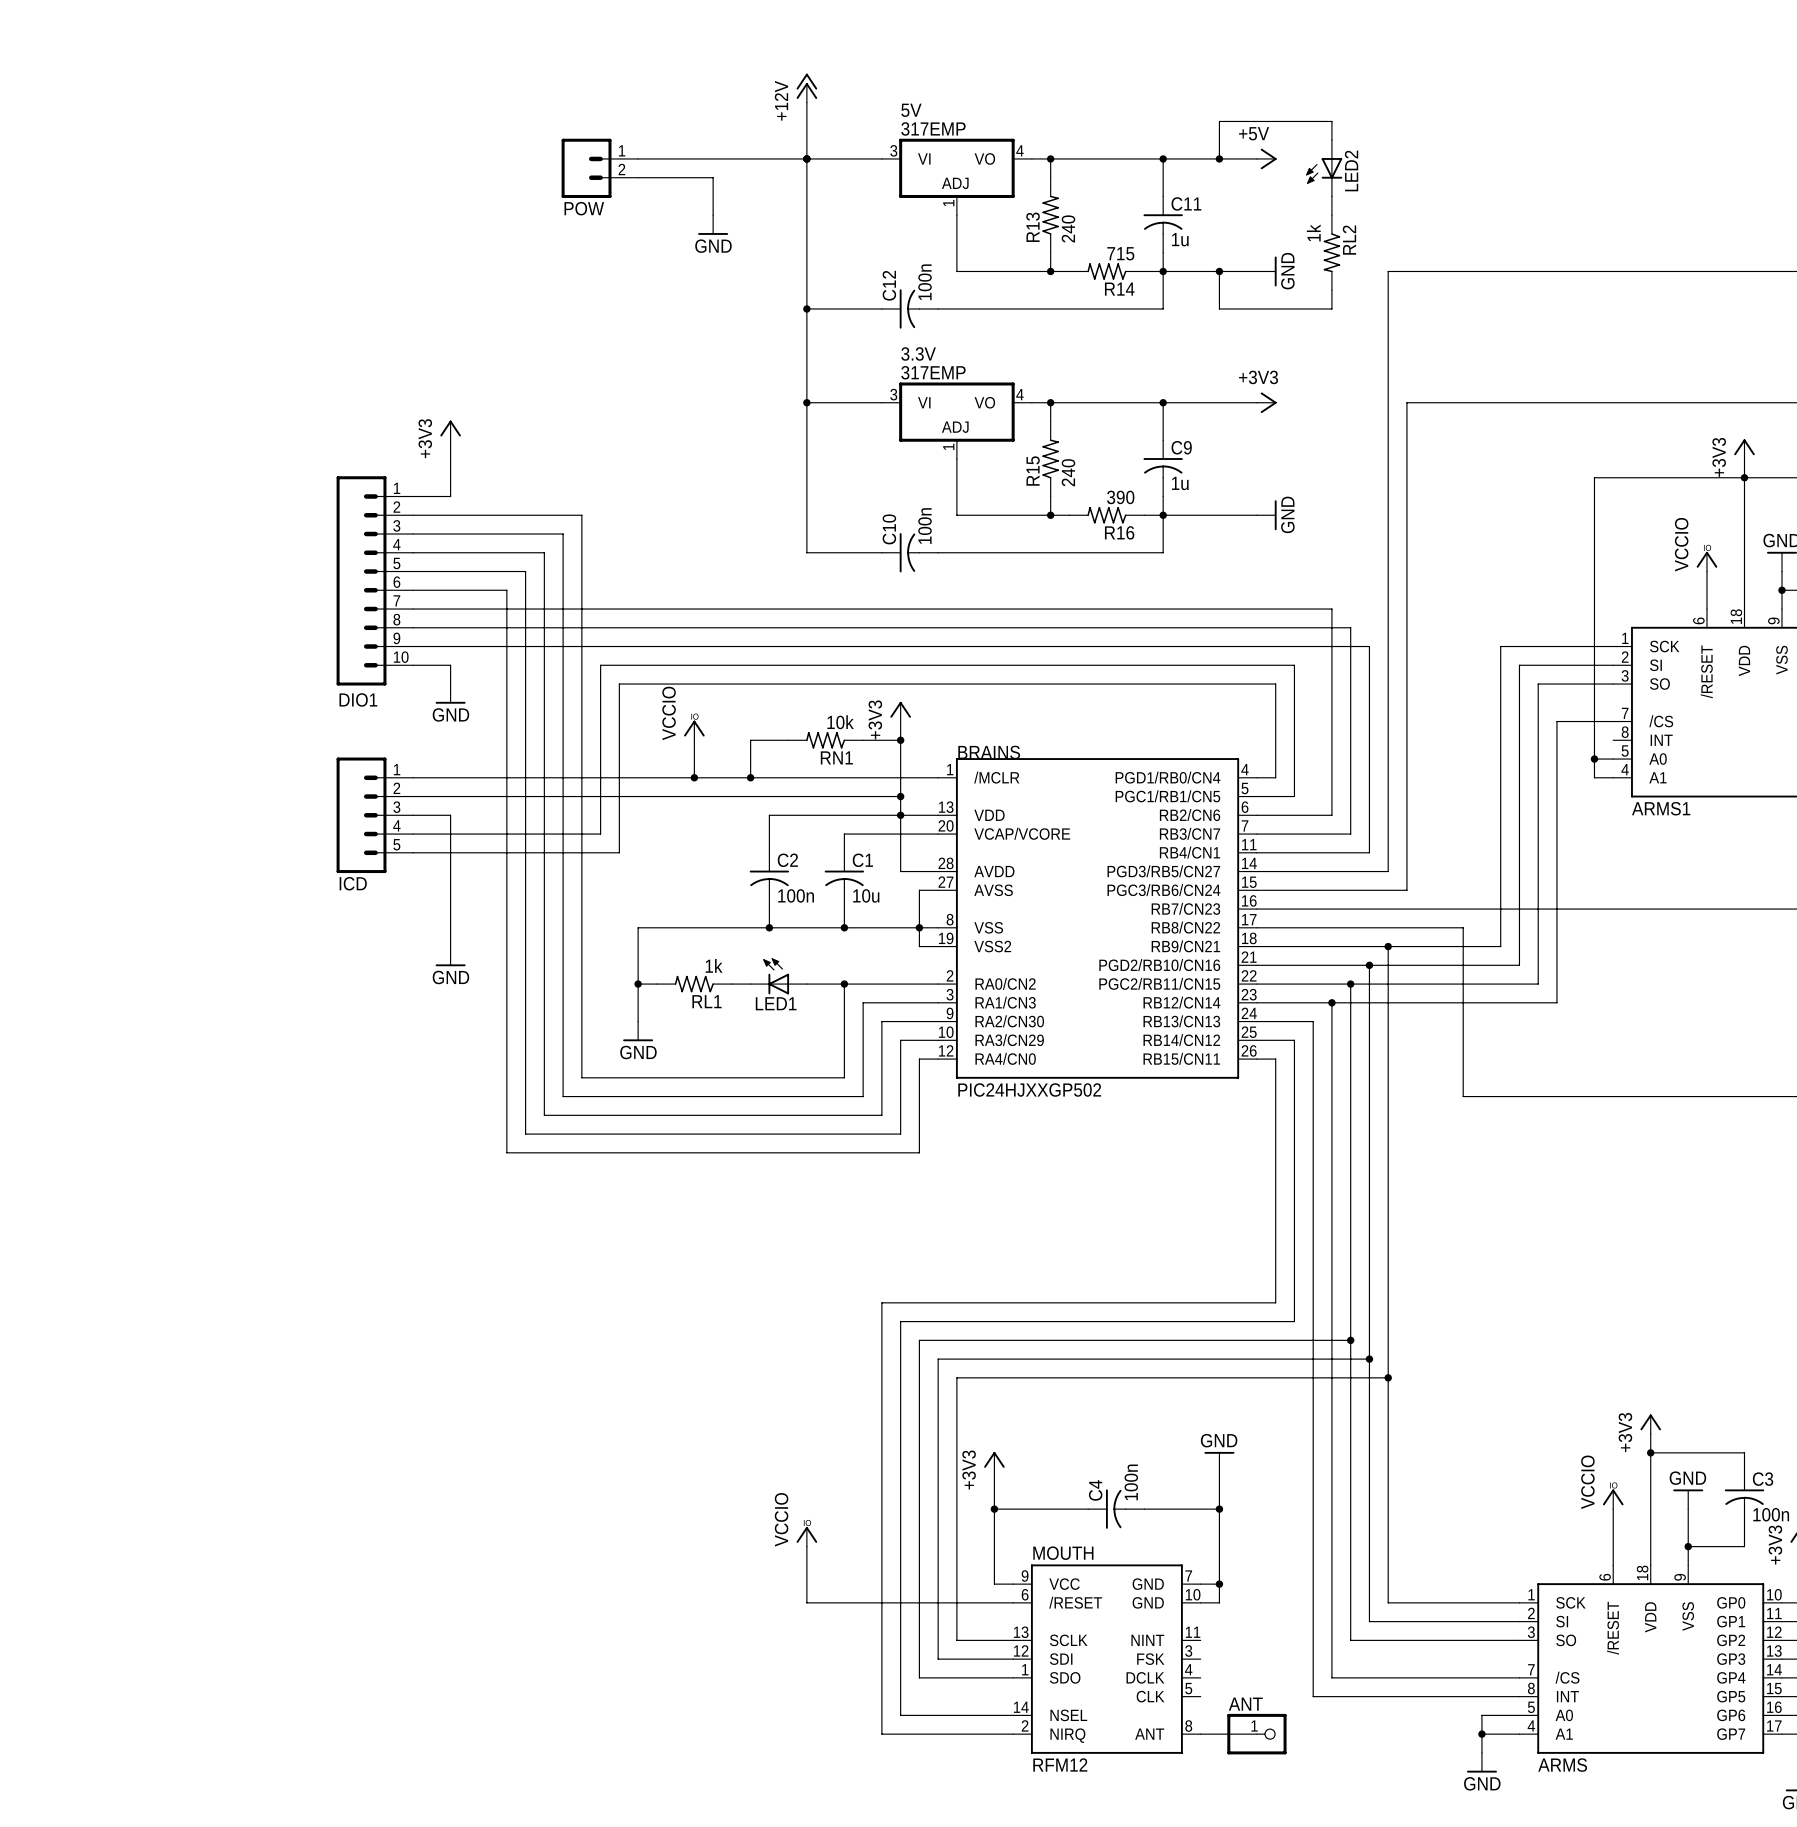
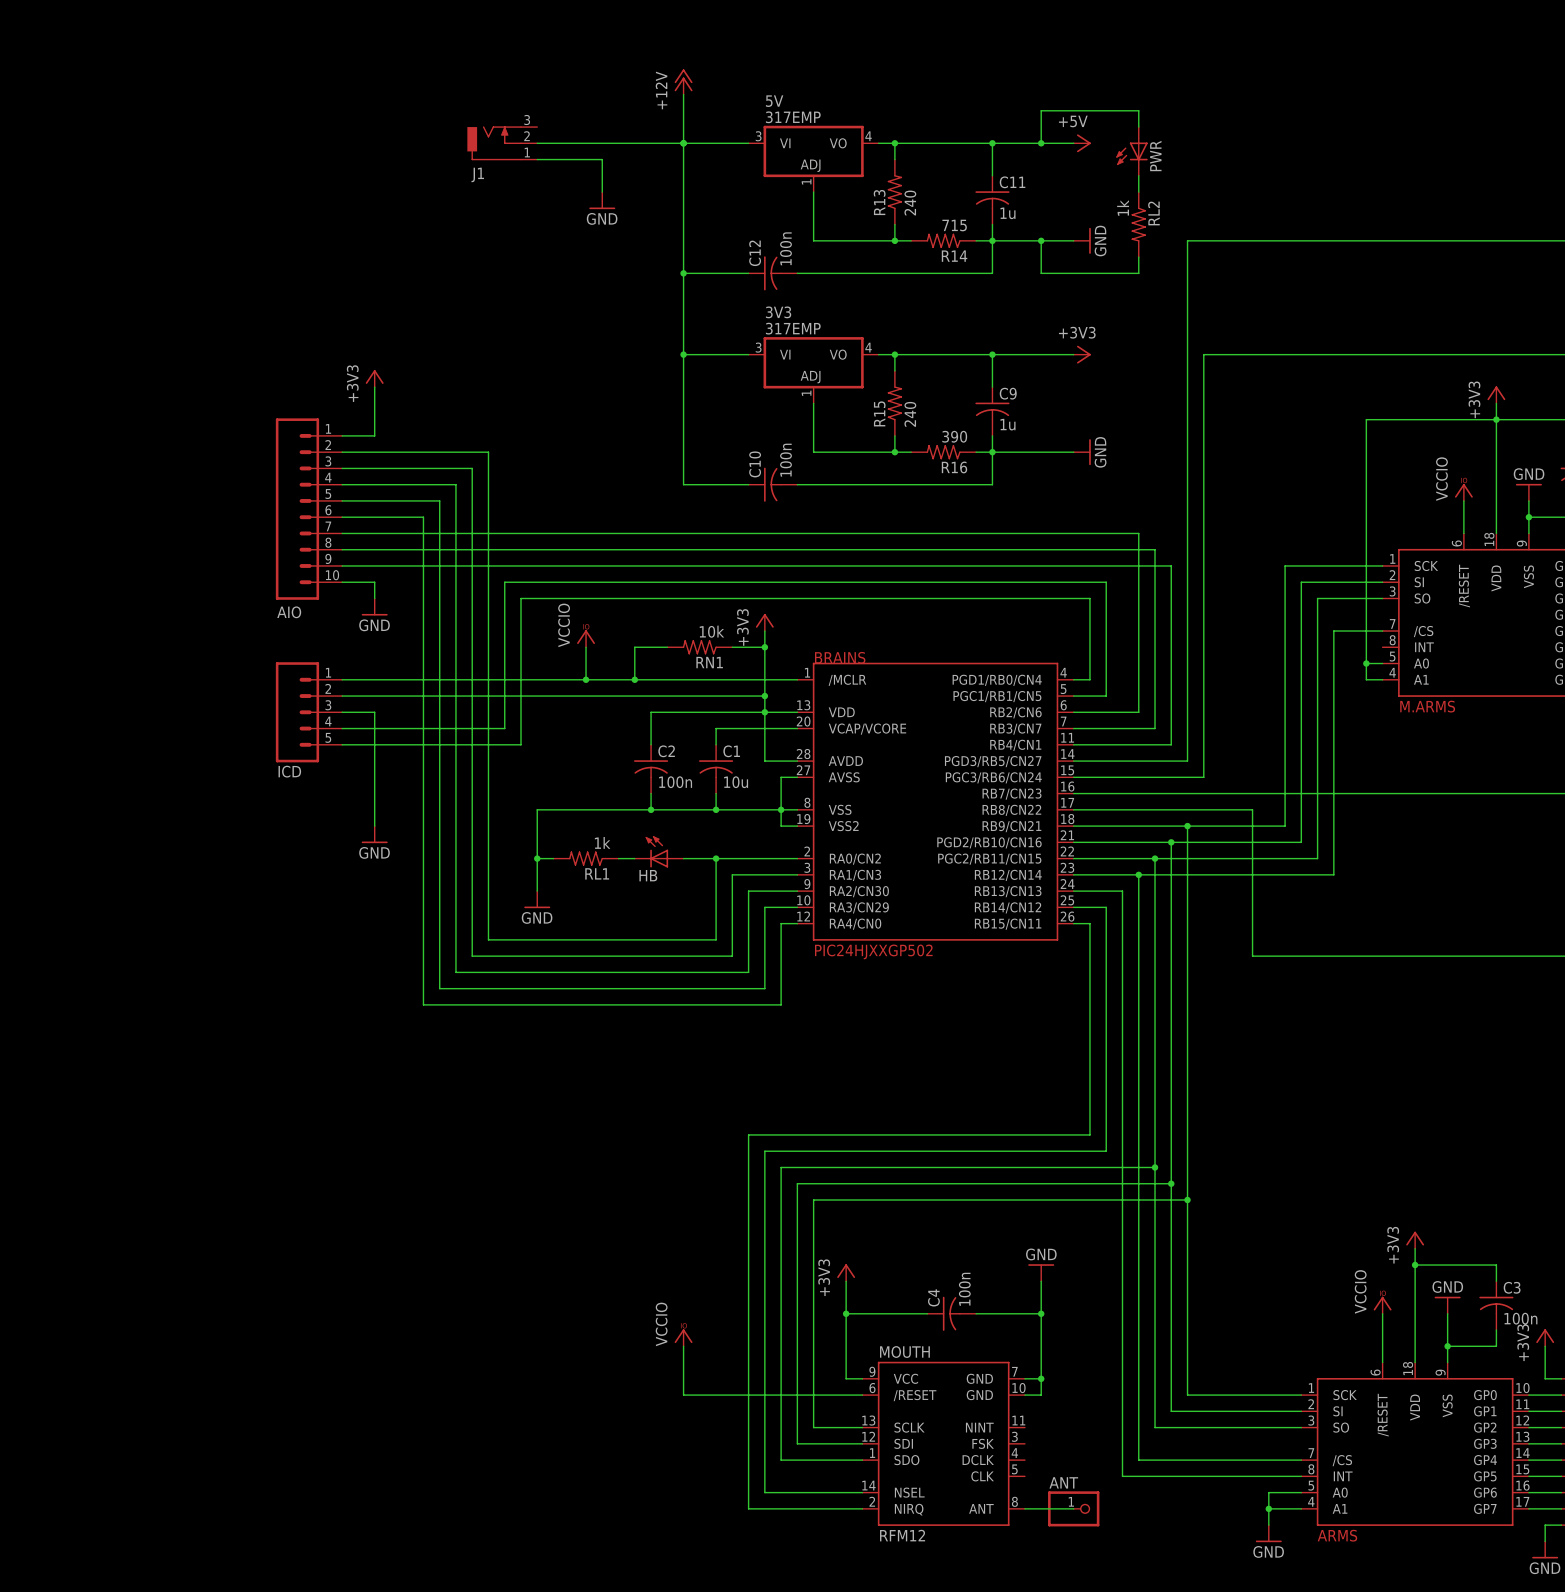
J1: none -> (502, 143)
POW: (599, 168) -> none
LED2 name: LED2 (1351, 170) -> PWR (1155, 156)
3.3V name: 3.3V (918, 353) -> 3V3 (778, 312)
DIO1 name: DIO1 (358, 699) -> AIO (289, 612)
ARMS1 name: ARMS1 (1661, 808) -> M.ARMS (1427, 706)
LED1 name: LED1 (776, 1003) -> HB (648, 875)

